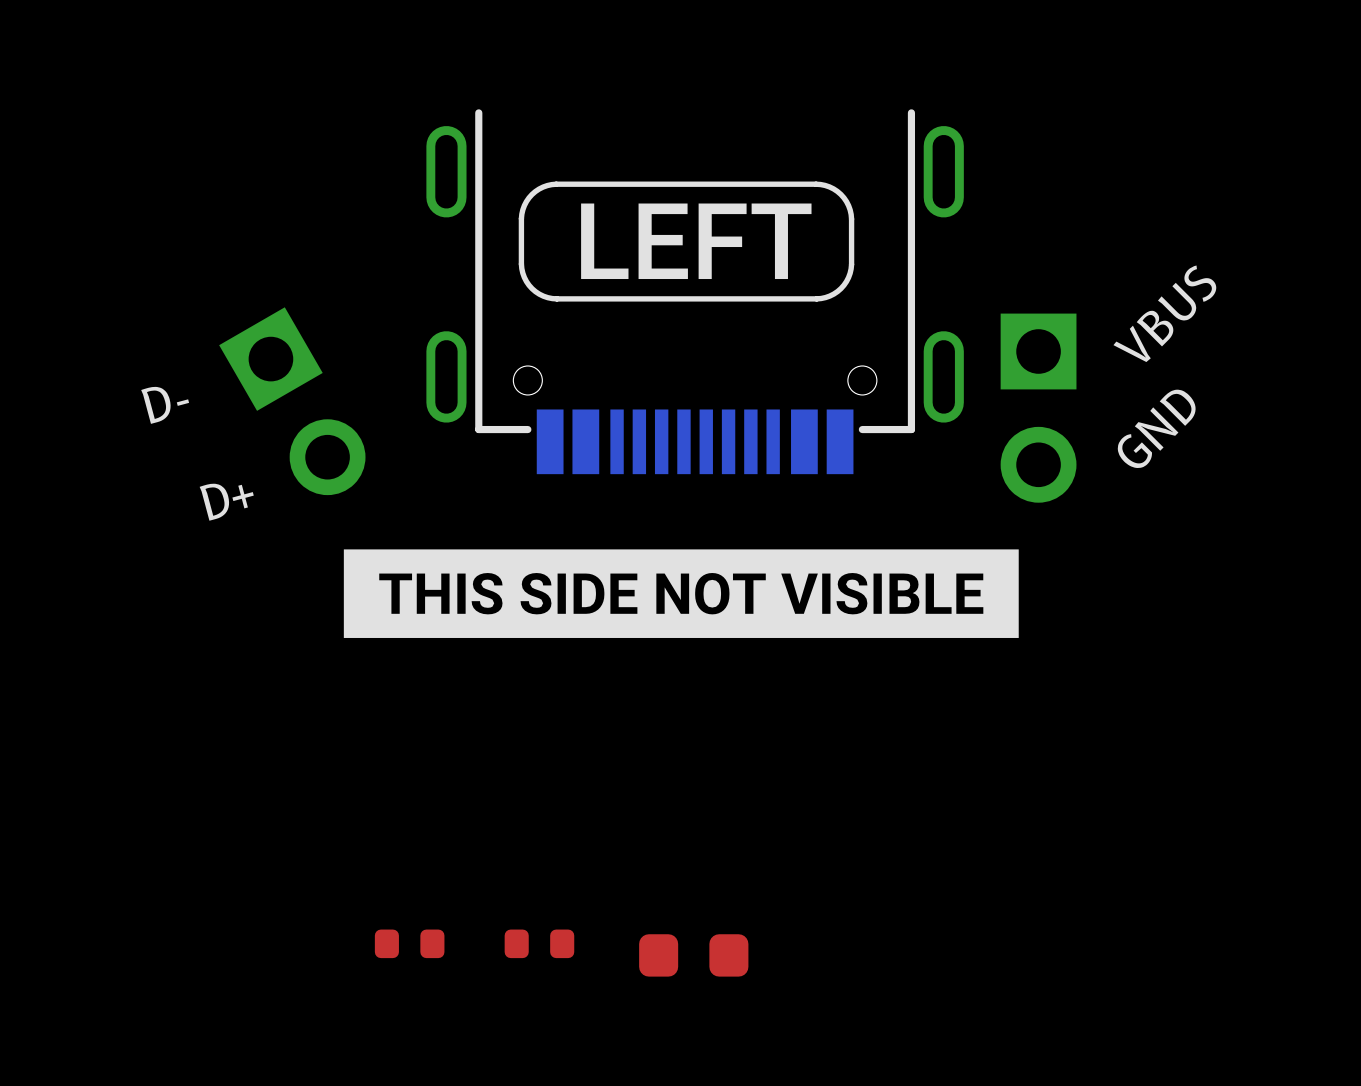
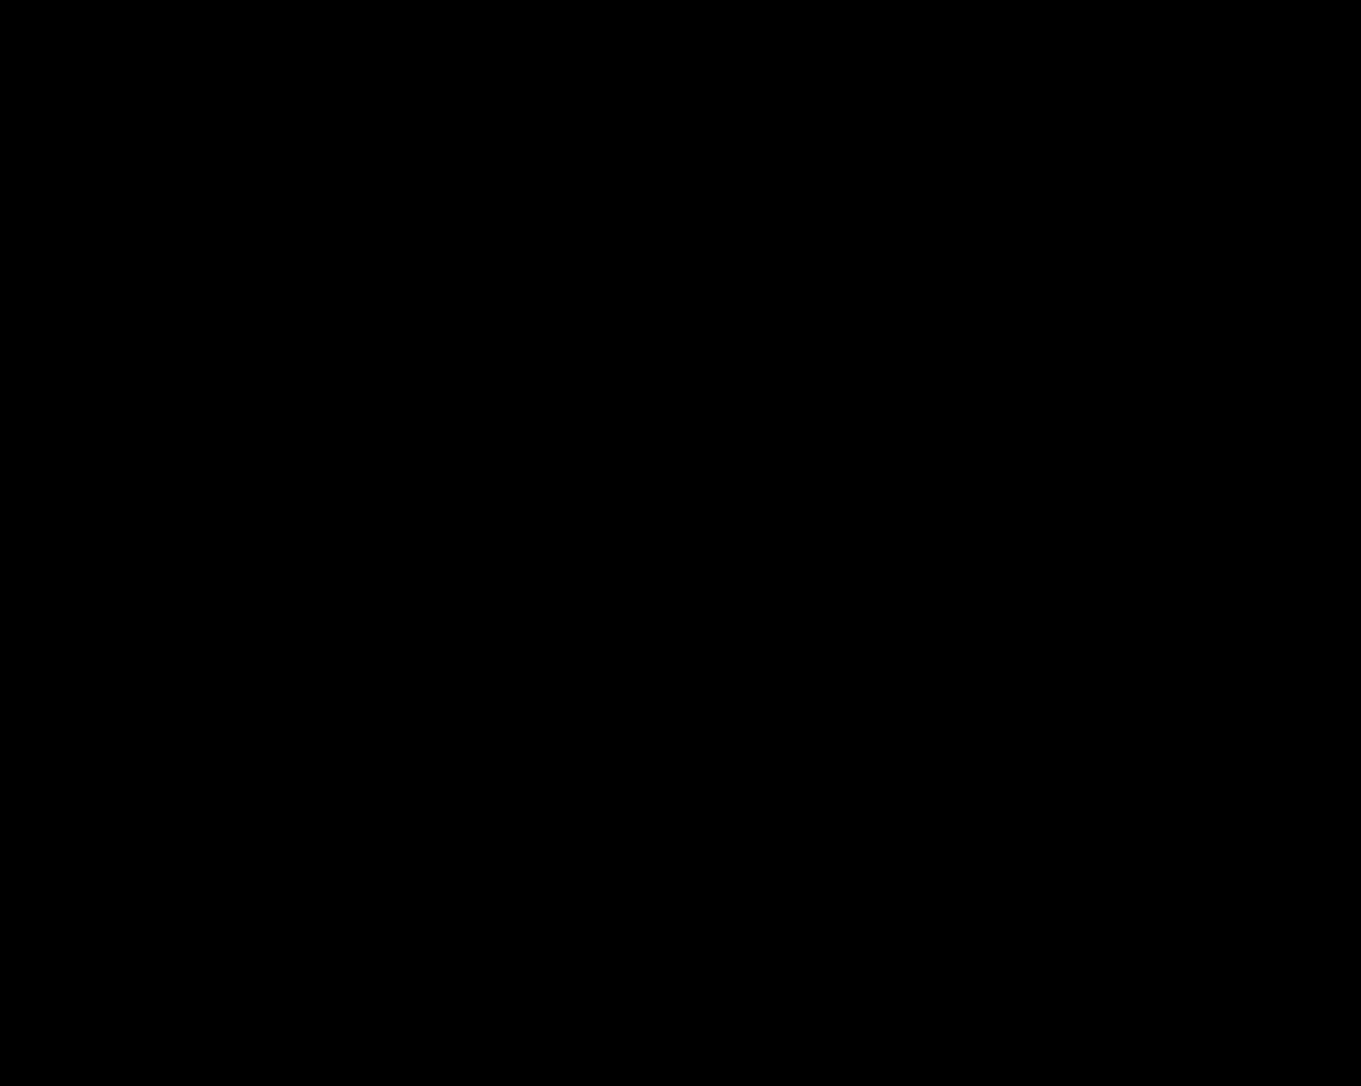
line: (816, 184) (547, 185) (532, 194) (522, 209) (522, 273) (529, 285) (535, 291) (552, 298) (825, 297) (840, 288) (850, 273) (851, 219) (848, 205) (840, 194) (829, 186) (816, 184) -> none
drawing: [581, 203, 812, 280] -> none
part: (695, 291) -> none
text: VBUS (1164, 313) -> none
part: (292, 401) -> none
text: D- (165, 405) -> none
part: (1038, 408) -> none
text: GND (1156, 428) -> none
text: D+ (226, 502) -> none
drawing: [343, 549, 1019, 638] -> none
part: (409, 943) -> none
part: (539, 943) -> none
part: (693, 955) -> none

